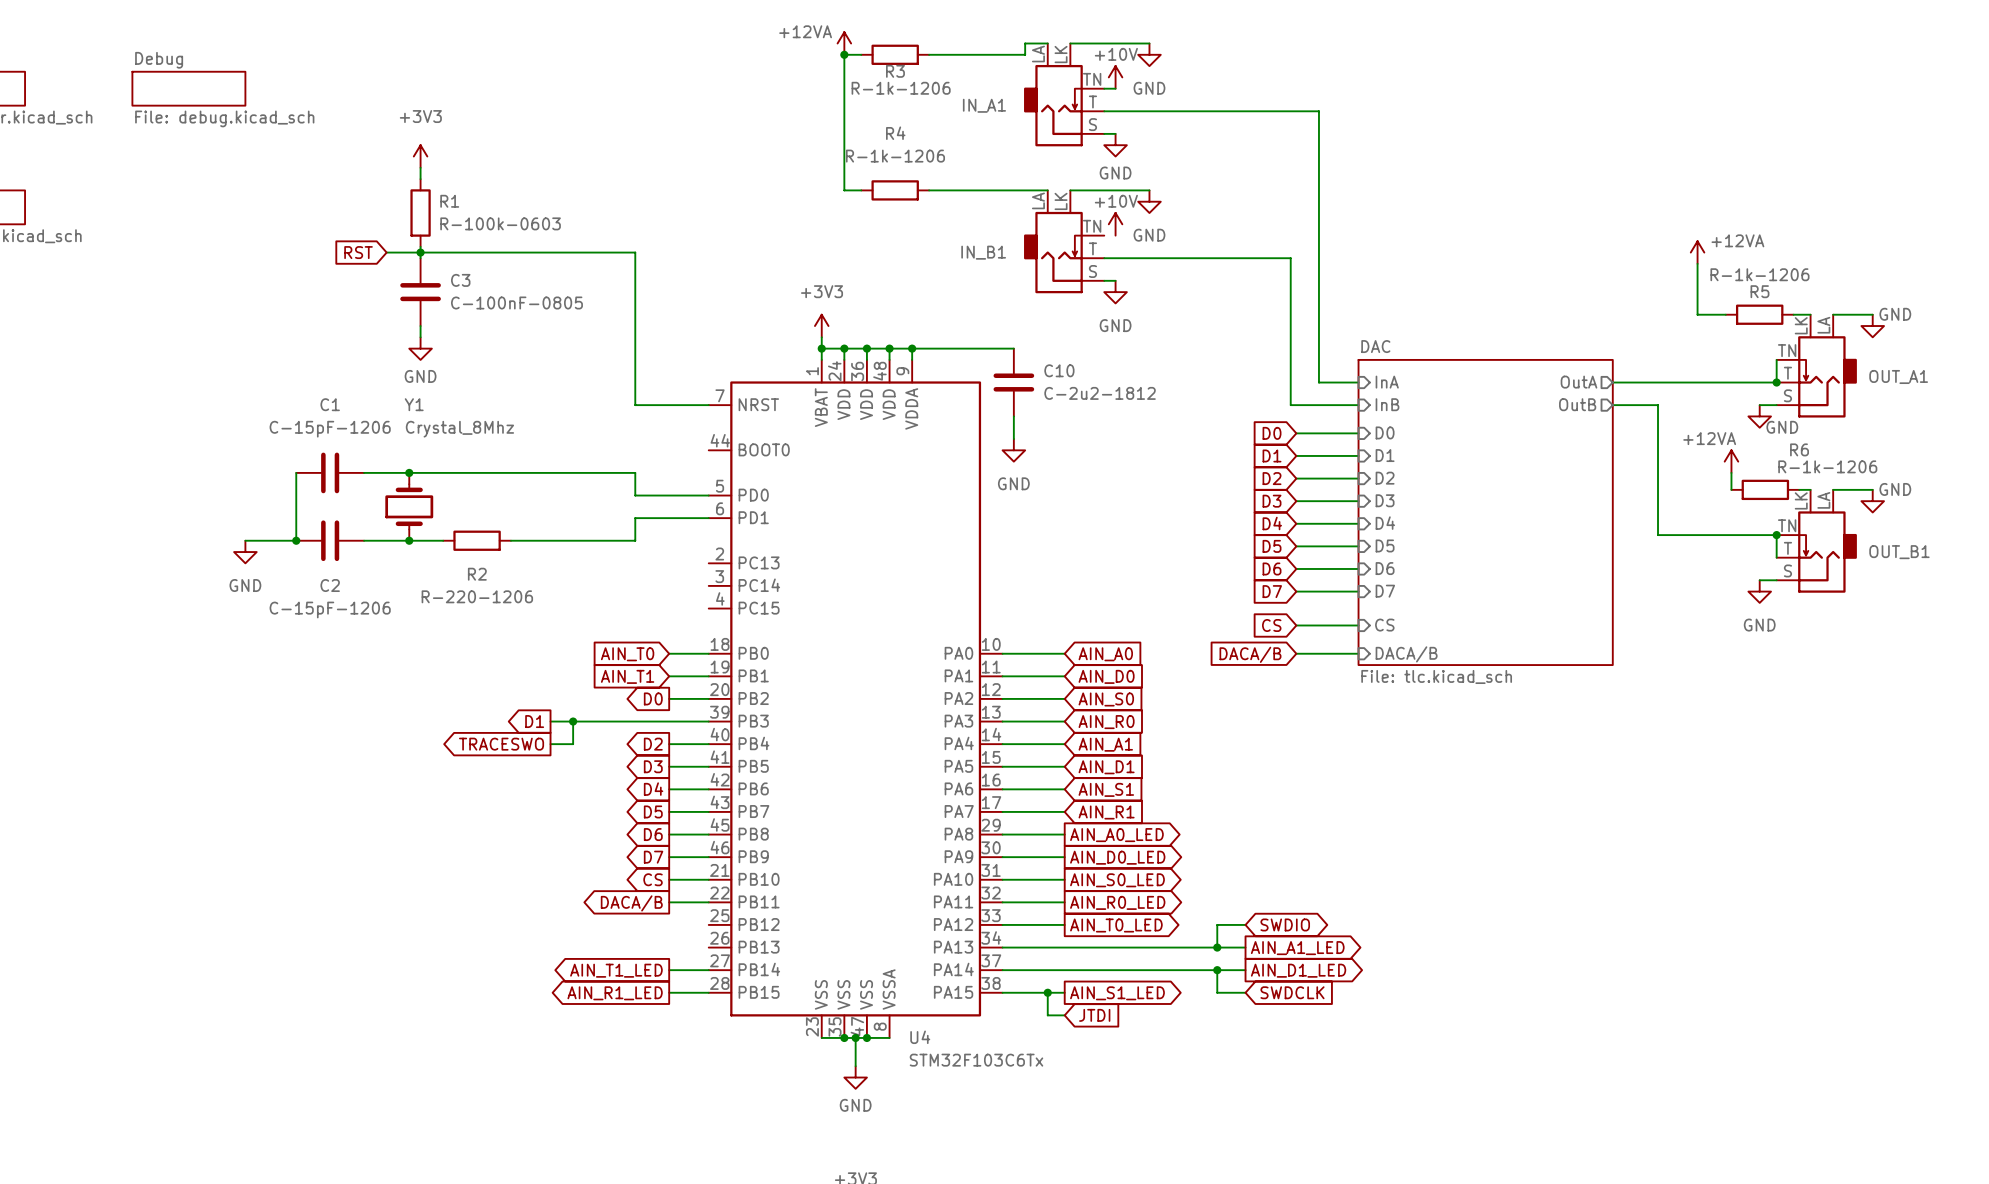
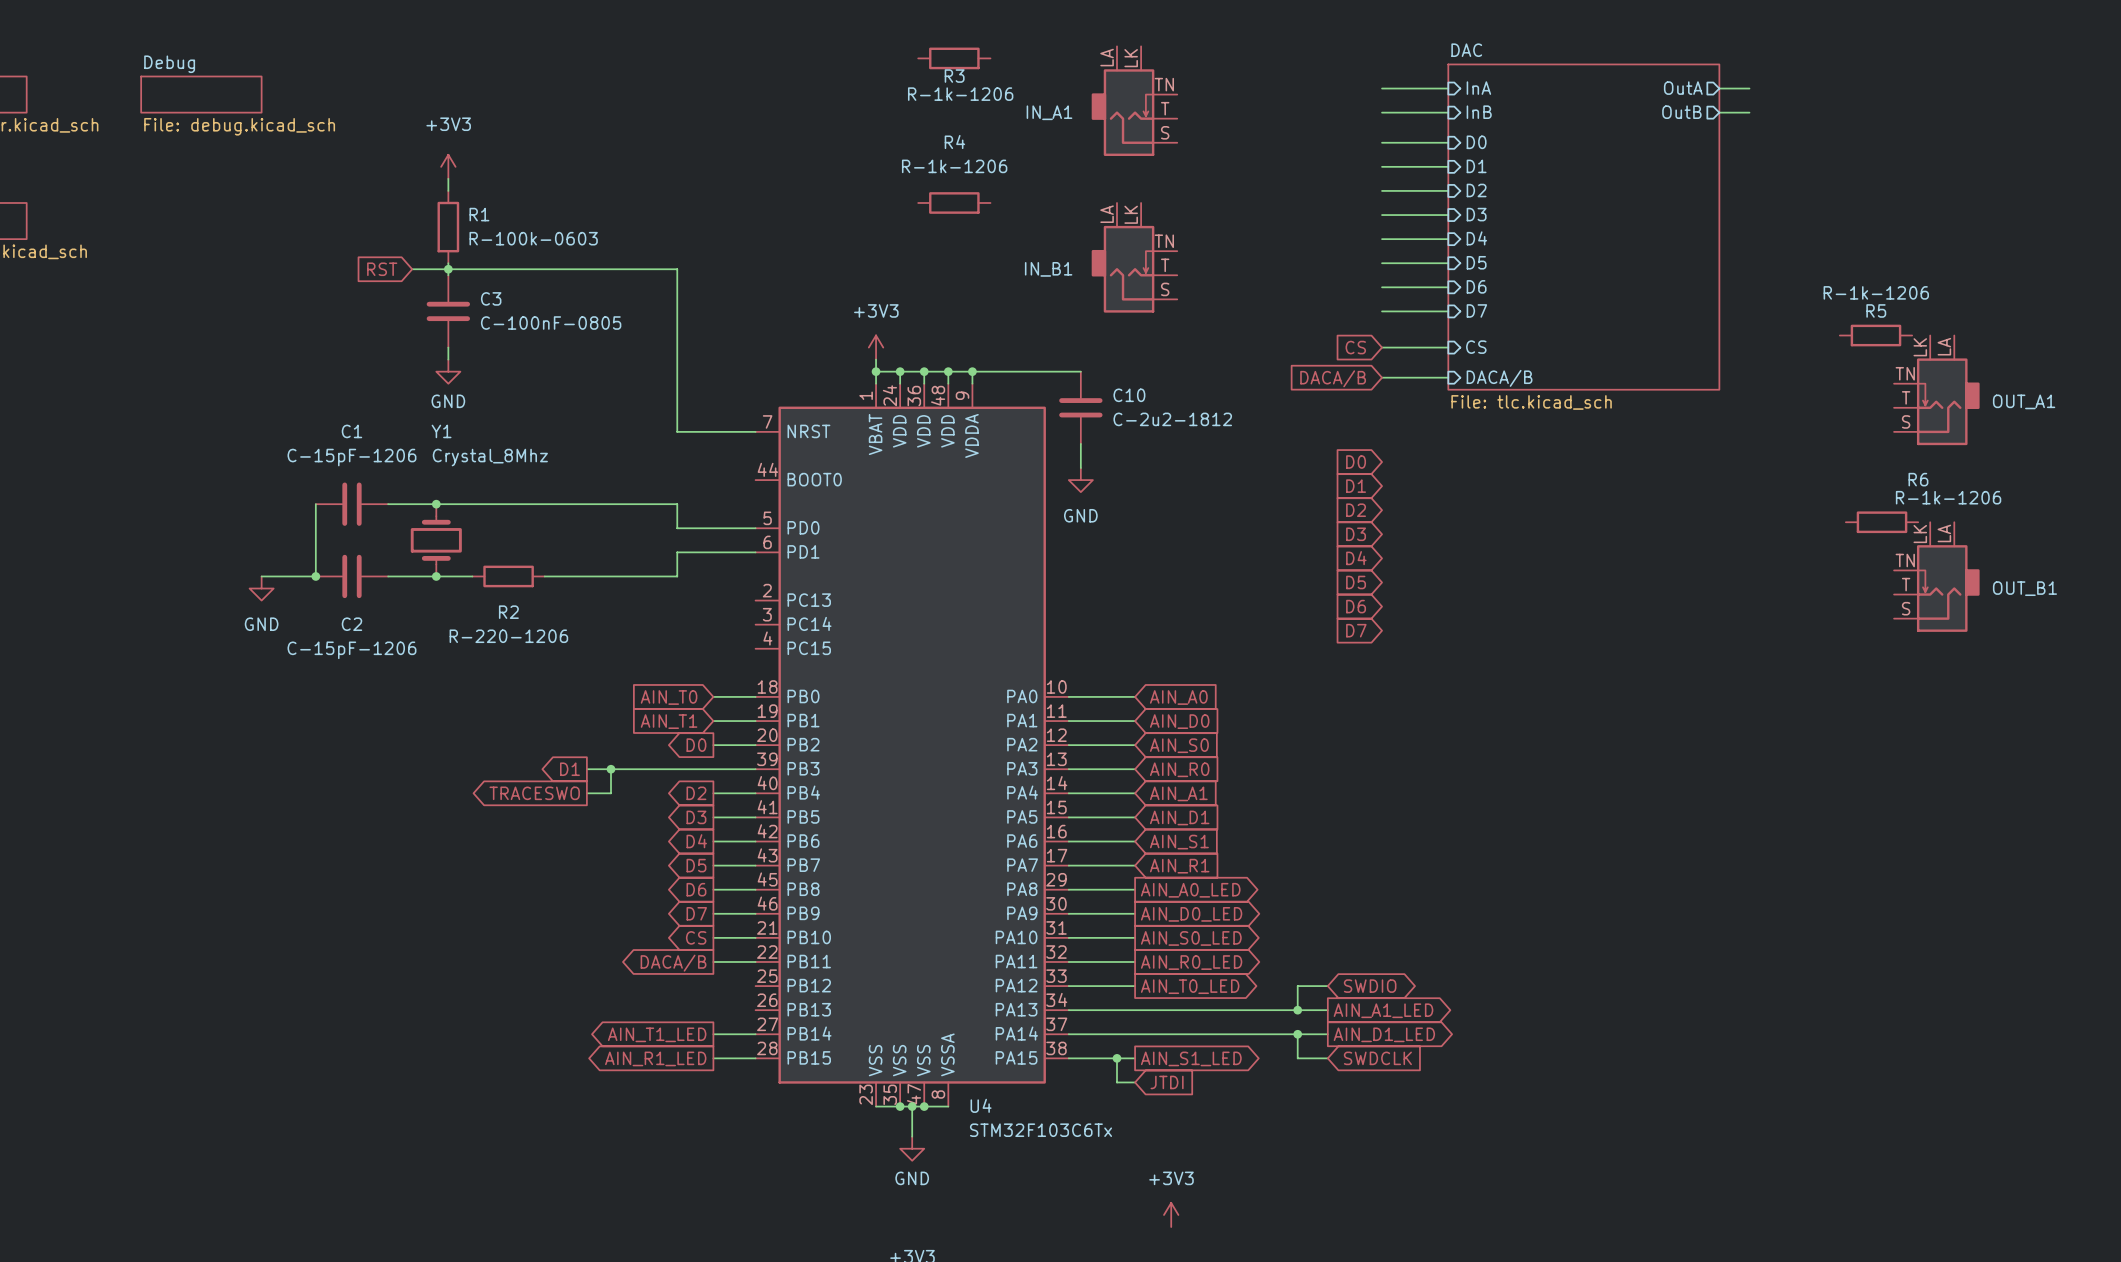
power symbol: +12VA (844, 43) -> none
wire: (1047, 43) (1025, 43) (1025, 54) (929, 54) -> none
wire: (1070, 43) (1149, 43) -> none
junction: (844, 54) -> none
wire: (861, 54) (844, 54) (844, 190) (861, 190) -> none
power symbol: GND (1149, 54) -> none
power symbol: +10V (1115, 77) -> none
sheet pin: none -> InA (1478, 88)
sheet pin: none -> OutA (1683, 88)
wire: none -> (1382, 88) (1448, 88)
wire: none -> (1719, 88) (1749, 88)
wire: (1104, 88) (1115, 88) -> none
wire: none -> (1382, 112) (1448, 112)
sheet pin: none -> InB (1479, 112)
sheet pin: none -> OutB (1681, 112)
wire: none -> (1719, 112) (1749, 112)
wire: (1104, 111) (1318, 111) (1318, 382) (1358, 382) -> none
wire: (1104, 133) (1115, 133) -> none
wire: none -> (1382, 142) (1448, 142)
sheet pin: none -> D0 (1476, 142)
power symbol: GND (1115, 145) -> none
wire: none -> (1382, 166) (1448, 166)
sheet pin: none -> D1 (1476, 166)
sheet pin: none -> D2 (1476, 190)
wire: none -> (1382, 190) (1448, 190)
wire: (929, 190) (1047, 190) -> none
wire: (1070, 190) (1149, 190) -> none
power symbol: GND (1149, 201) -> none
wire: none -> (1382, 215) (1448, 215)
sheet pin: none -> D3 (1476, 214)
sheet DAC: none -> File: tlc.kicad_sch (1583, 227)
sheet pin: none -> D4 (1476, 238)
power symbol: +10V (1115, 224) -> none
sheet pin: none -> D5 (1476, 262)
power symbol: +12VA (1697, 252) -> none
wire: (1104, 258) (1290, 258) (1290, 405) (1358, 405) -> none
wire: (1697, 263) (1697, 314) (1725, 314) -> none
sheet pin: none -> D6 (1476, 286)
wire: (1104, 280) (1115, 280) -> none
sheet pin: none -> D7 (1476, 310)
power symbol: GND (1115, 292) -> none
wire: (1793, 314) (1810, 314) -> none
wire: (1833, 314) (1872, 314) -> none
sheet pin: none -> CS (1476, 347)
global label: none -> CS (1355, 347)
power symbol: GND (1872, 326) -> none
sheet pin: none -> DACA/B (1499, 378)
global label: none -> DACA/B (1333, 378)
wire: (1776, 359) (1776, 382) (1612, 382) -> none
sheet pin: InA (1387, 382) -> none
sheet pin: OutA (1578, 382) -> none
junction: (1776, 382) -> none
sheet pin: InB (1387, 404) -> none
sheet pin: OutB (1577, 404) -> none
wire: (1612, 405) (1658, 405) (1658, 535) (1776, 535) (1776, 557) -> none
wire: (1759, 405) (1776, 405) -> none
power symbol: GND (1759, 416) -> none
sheet pin: D0 (1385, 432) -> none
wire: (1296, 433) (1358, 433) -> (1382, 239) (1448, 239)
wire: (1296, 455) (1358, 455) -> (1382, 263) (1448, 263)
sheet pin: D1 (1385, 455) -> none
power symbol: +12VA (1731, 461) -> none
wire: (1731, 472) (1731, 489) -> none
wire: (1296, 478) (1358, 478) -> (1382, 287) (1448, 287)
sheet pin: D2 (1385, 478) -> none
wire: (1799, 489) (1810, 489) -> none
wire: (1833, 489) (1872, 489) -> none
sheet pin: D3 (1385, 500) -> none
wire: (1296, 501) (1358, 501) -> (1382, 311) (1448, 311)
power symbol: GND (1872, 501) -> none
sheet DAC: File: tlc.kicad_sch (1485, 512) -> none
wire: (1296, 523) (1358, 523) -> (1382, 377) (1448, 377)
sheet pin: D4 (1385, 523) -> none
junction: (1776, 535) -> none
sheet pin: D5 (1385, 545) -> none
wire: (1296, 546) (1358, 546) -> (1382, 347) (1448, 347)
wire: (1296, 568) (1358, 568) -> none
sheet pin: D6 (1385, 568) -> none
wire: (1759, 580) (1776, 580) -> none
wire: (1296, 591) (1358, 591) -> none
sheet pin: D7 (1385, 591) -> none
power symbol: GND (1759, 591) -> none
global label: CS (1271, 625) -> none
wire: (1296, 625) (1358, 625) -> none
sheet pin: CS (1384, 625) -> none
wire: (1296, 653) (1358, 653) -> none
global label: DACA/B (1250, 654) -> none
sheet pin: DACA/B (1406, 654) -> none
power symbol: none -> +3V3 (1171, 1214)

